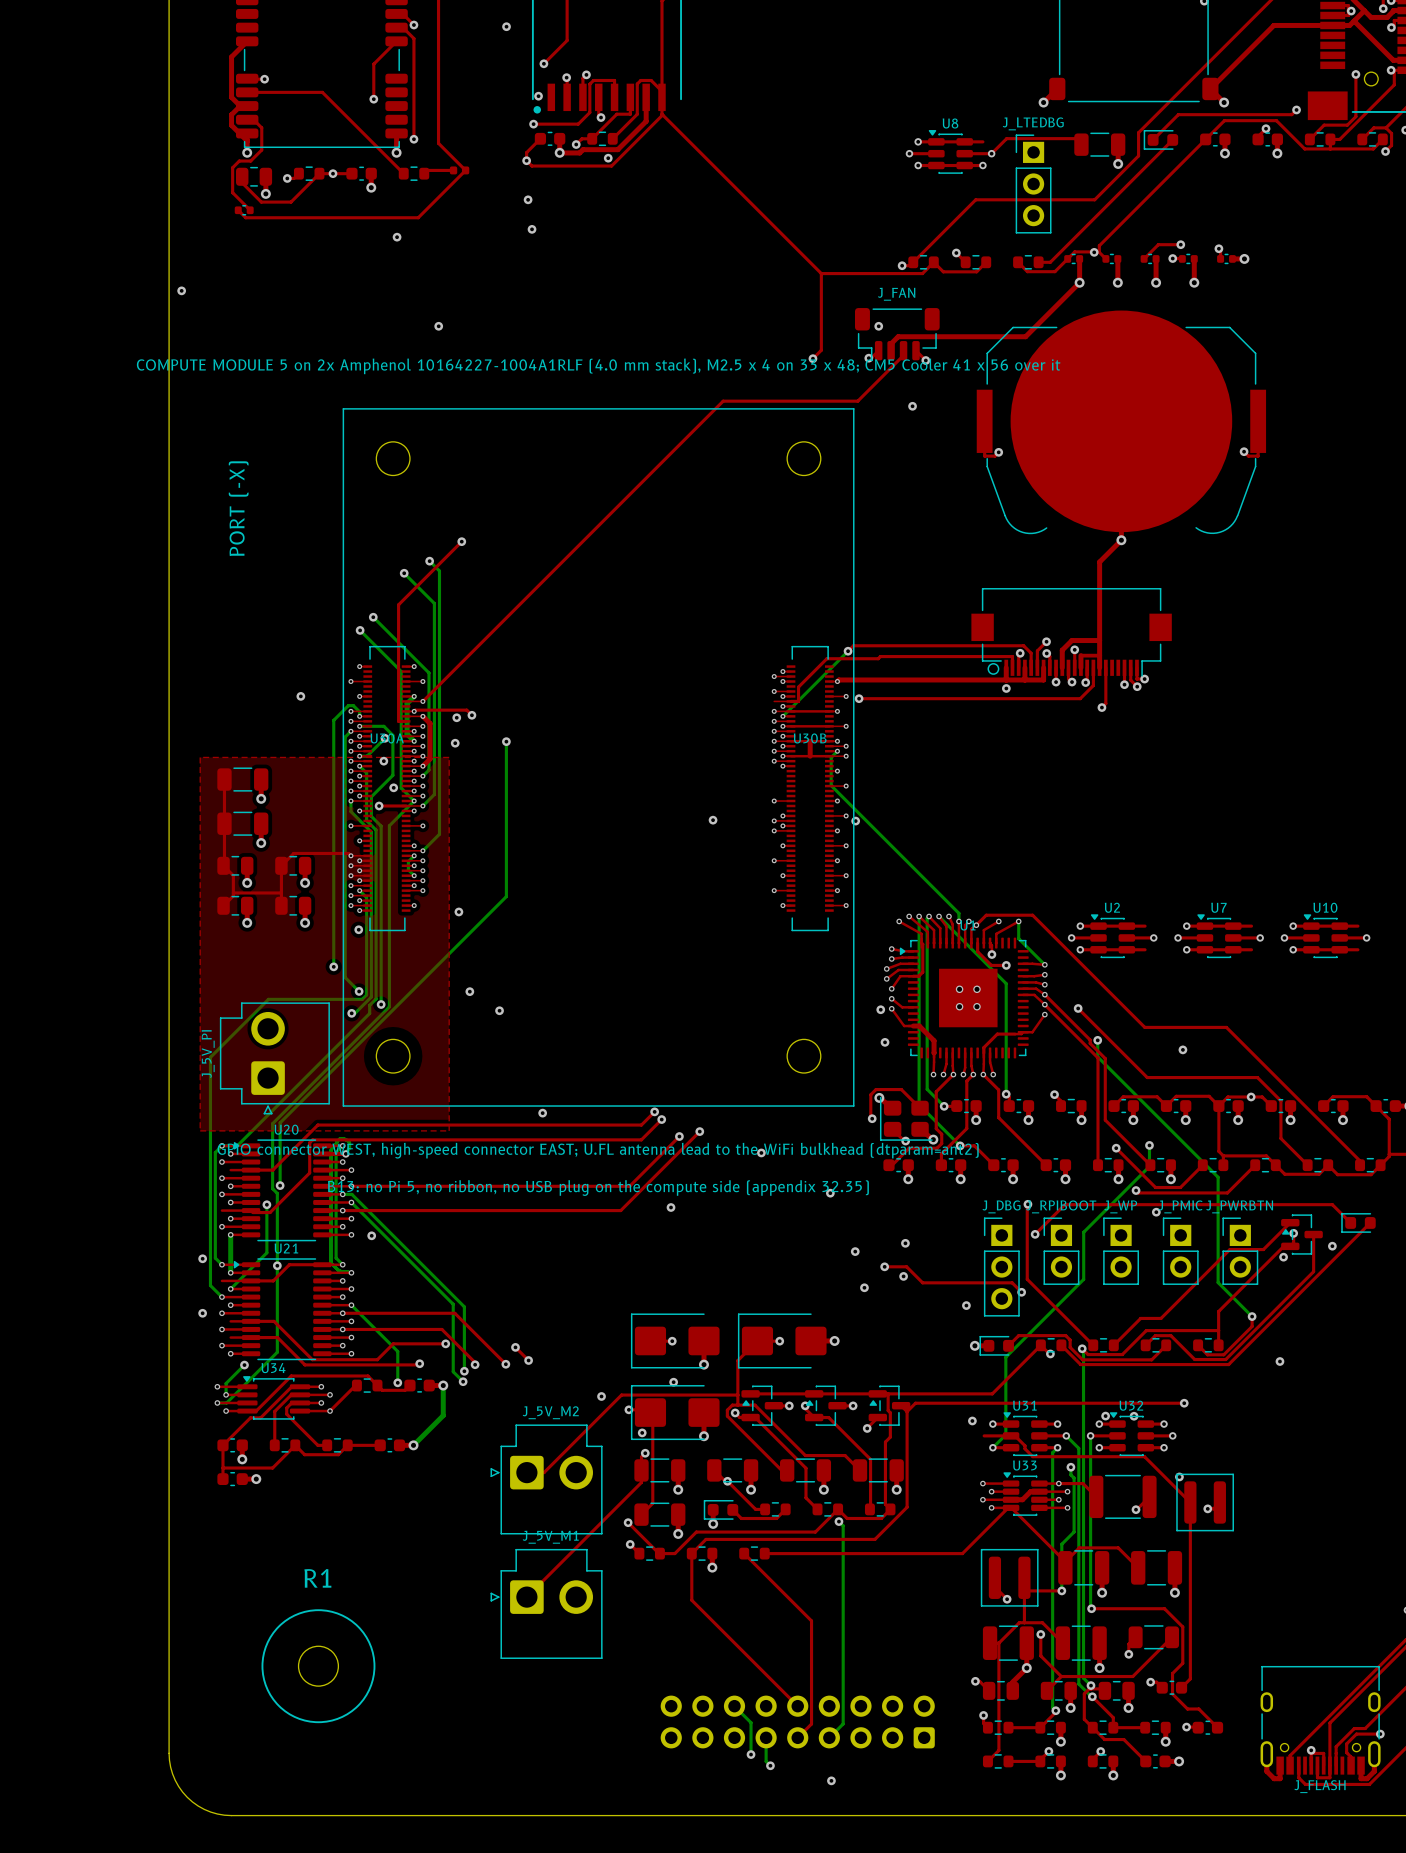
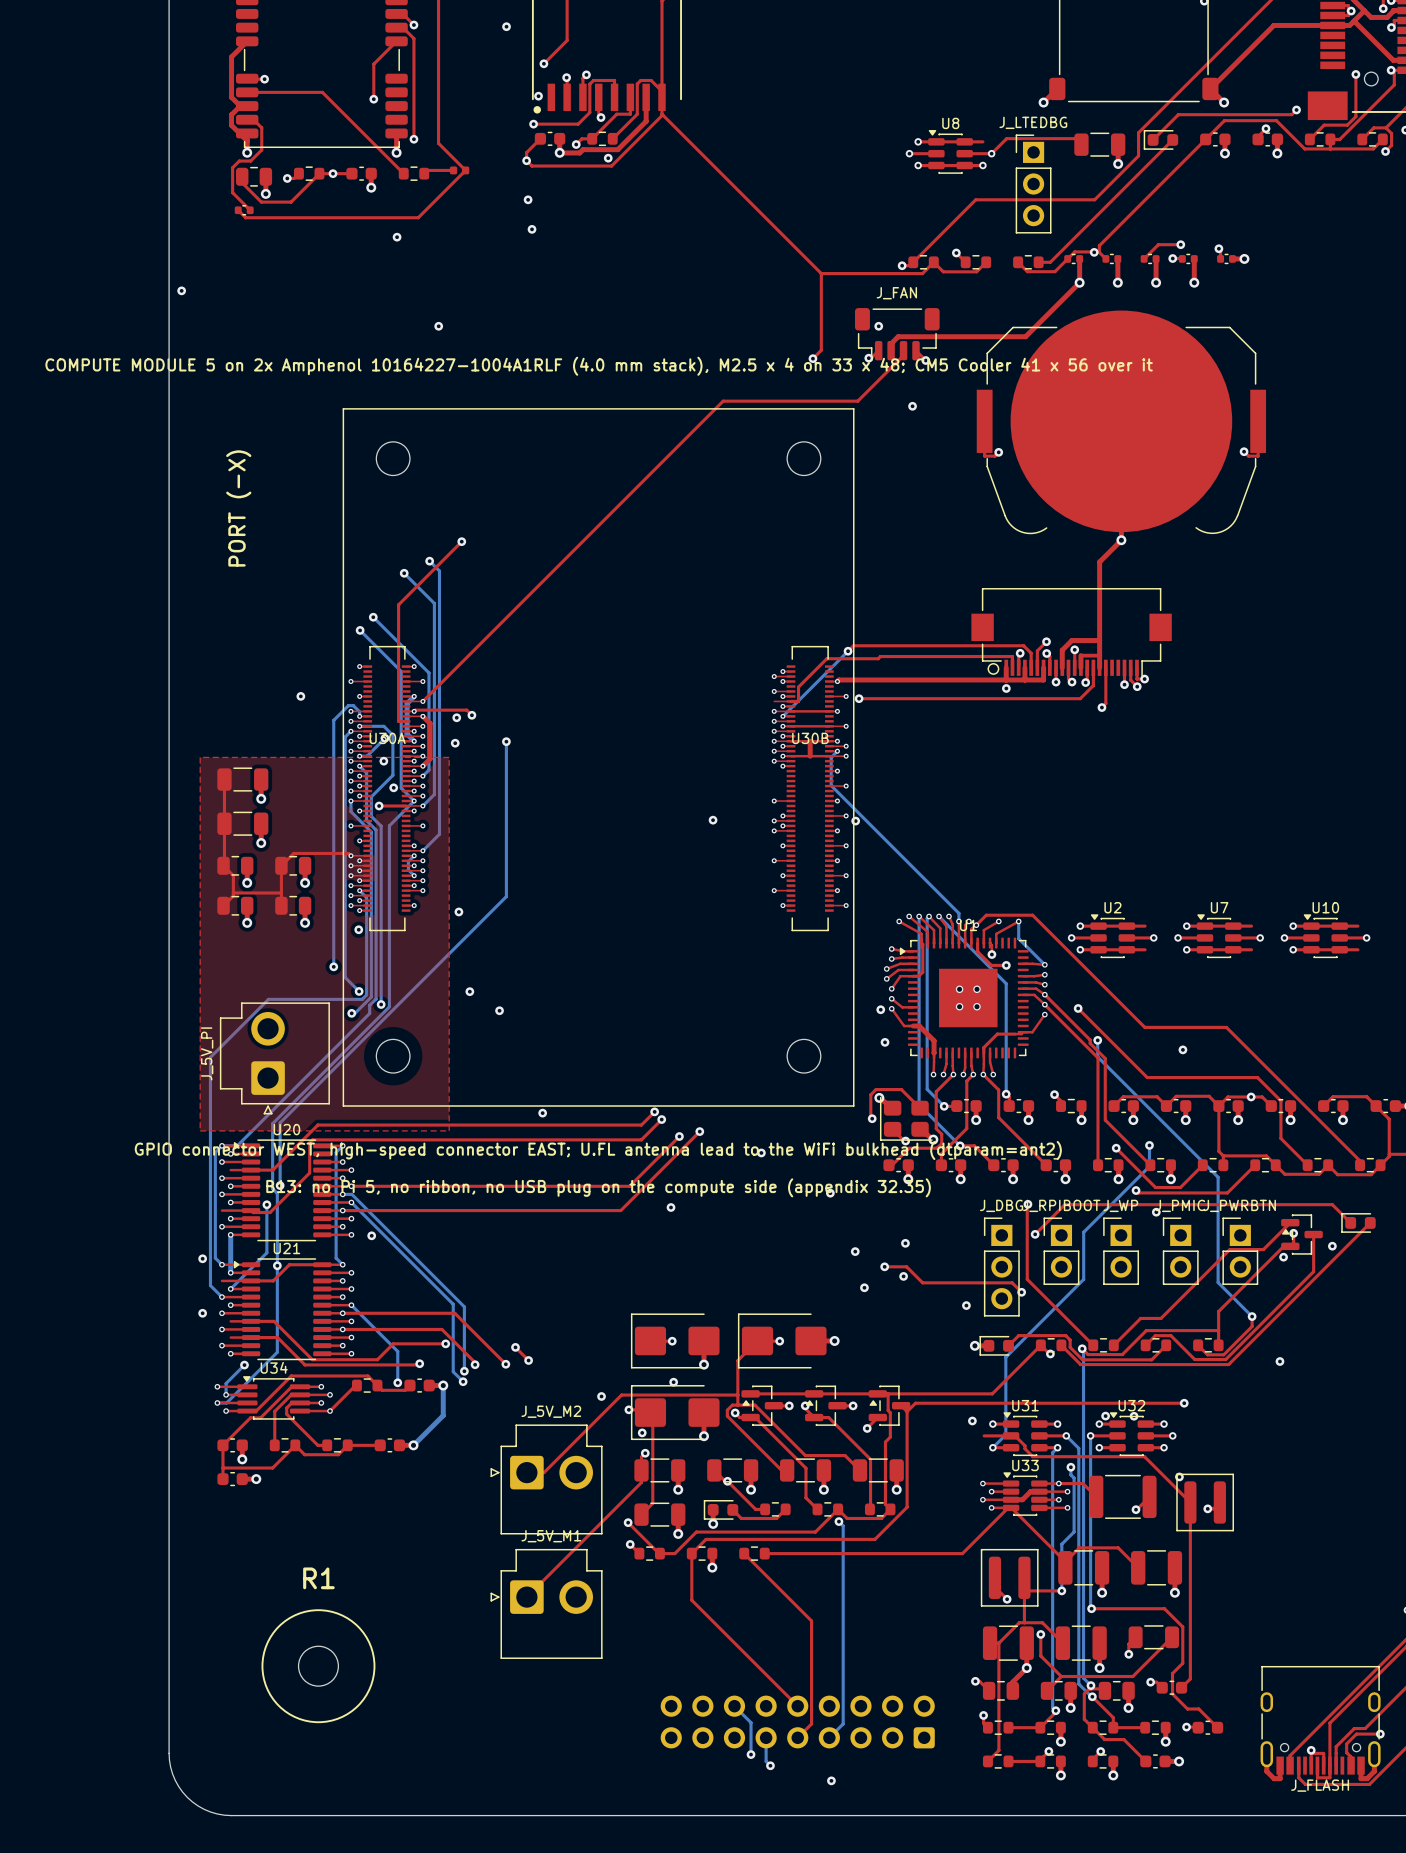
top track: (330, 1153) (345, 1153) -> none
bottom track: (345, 1153) (349, 1147) (349, 1142) (344, 1138) (339, 1138) (330, 1150) (330, 1262) (338, 1270) (348, 1272) -> none
via: (345, 1153) -> none

